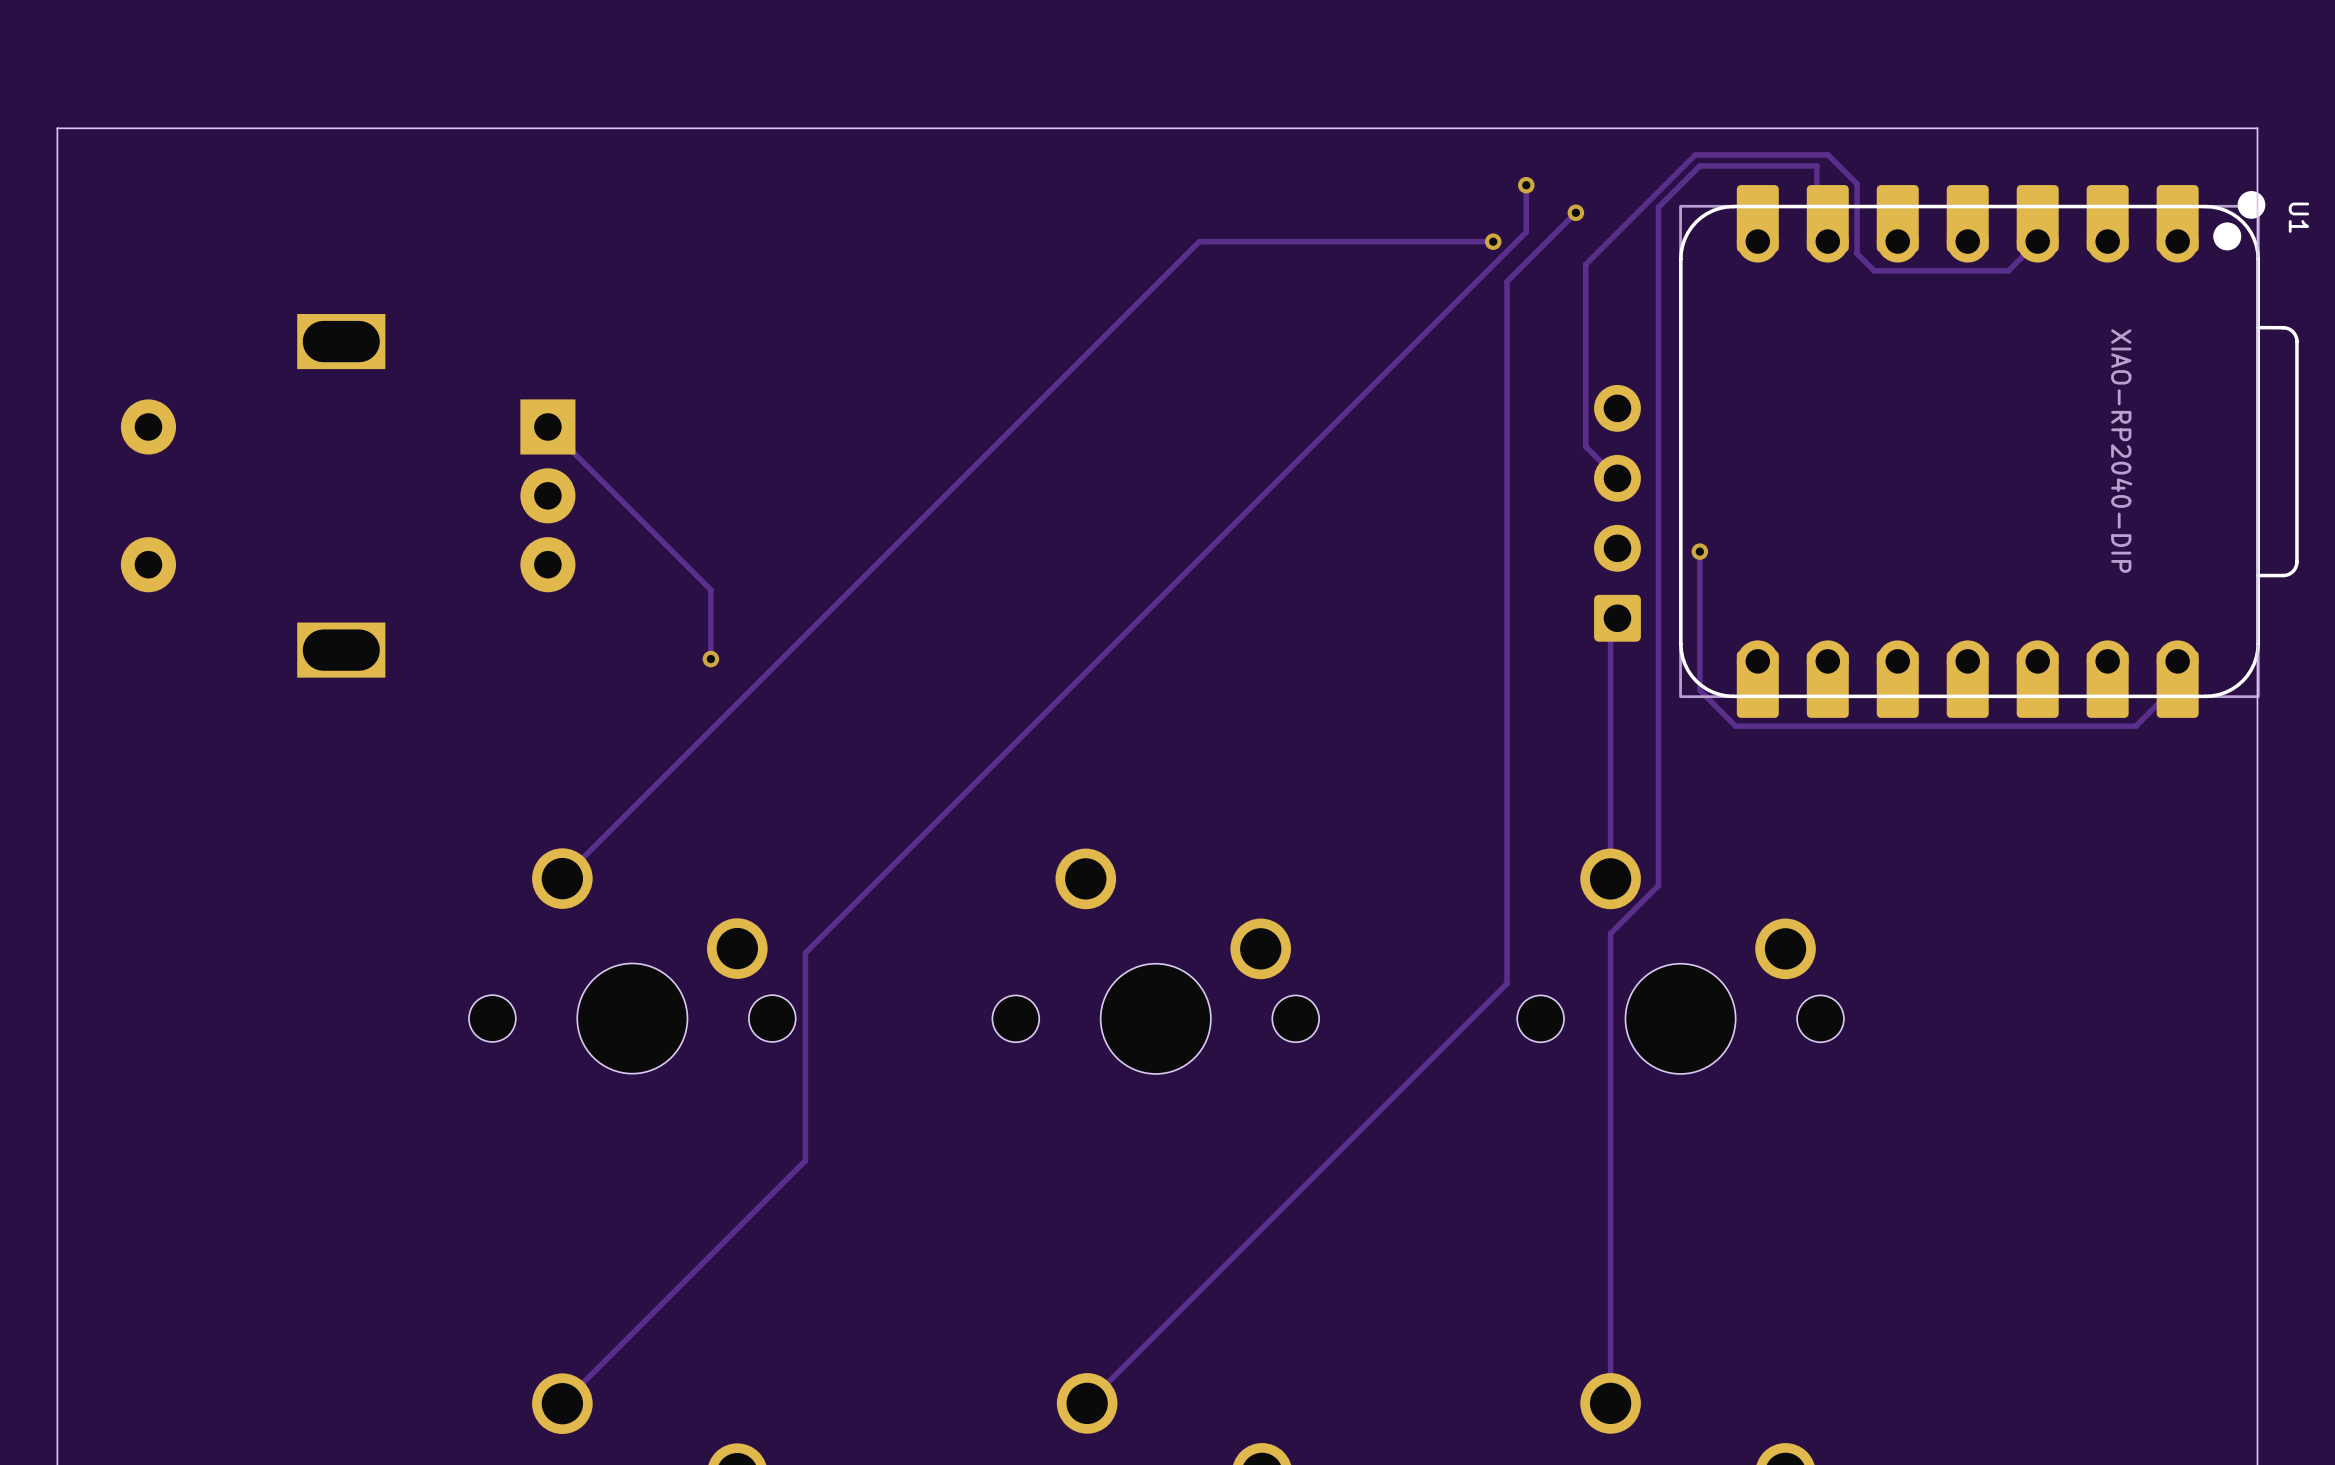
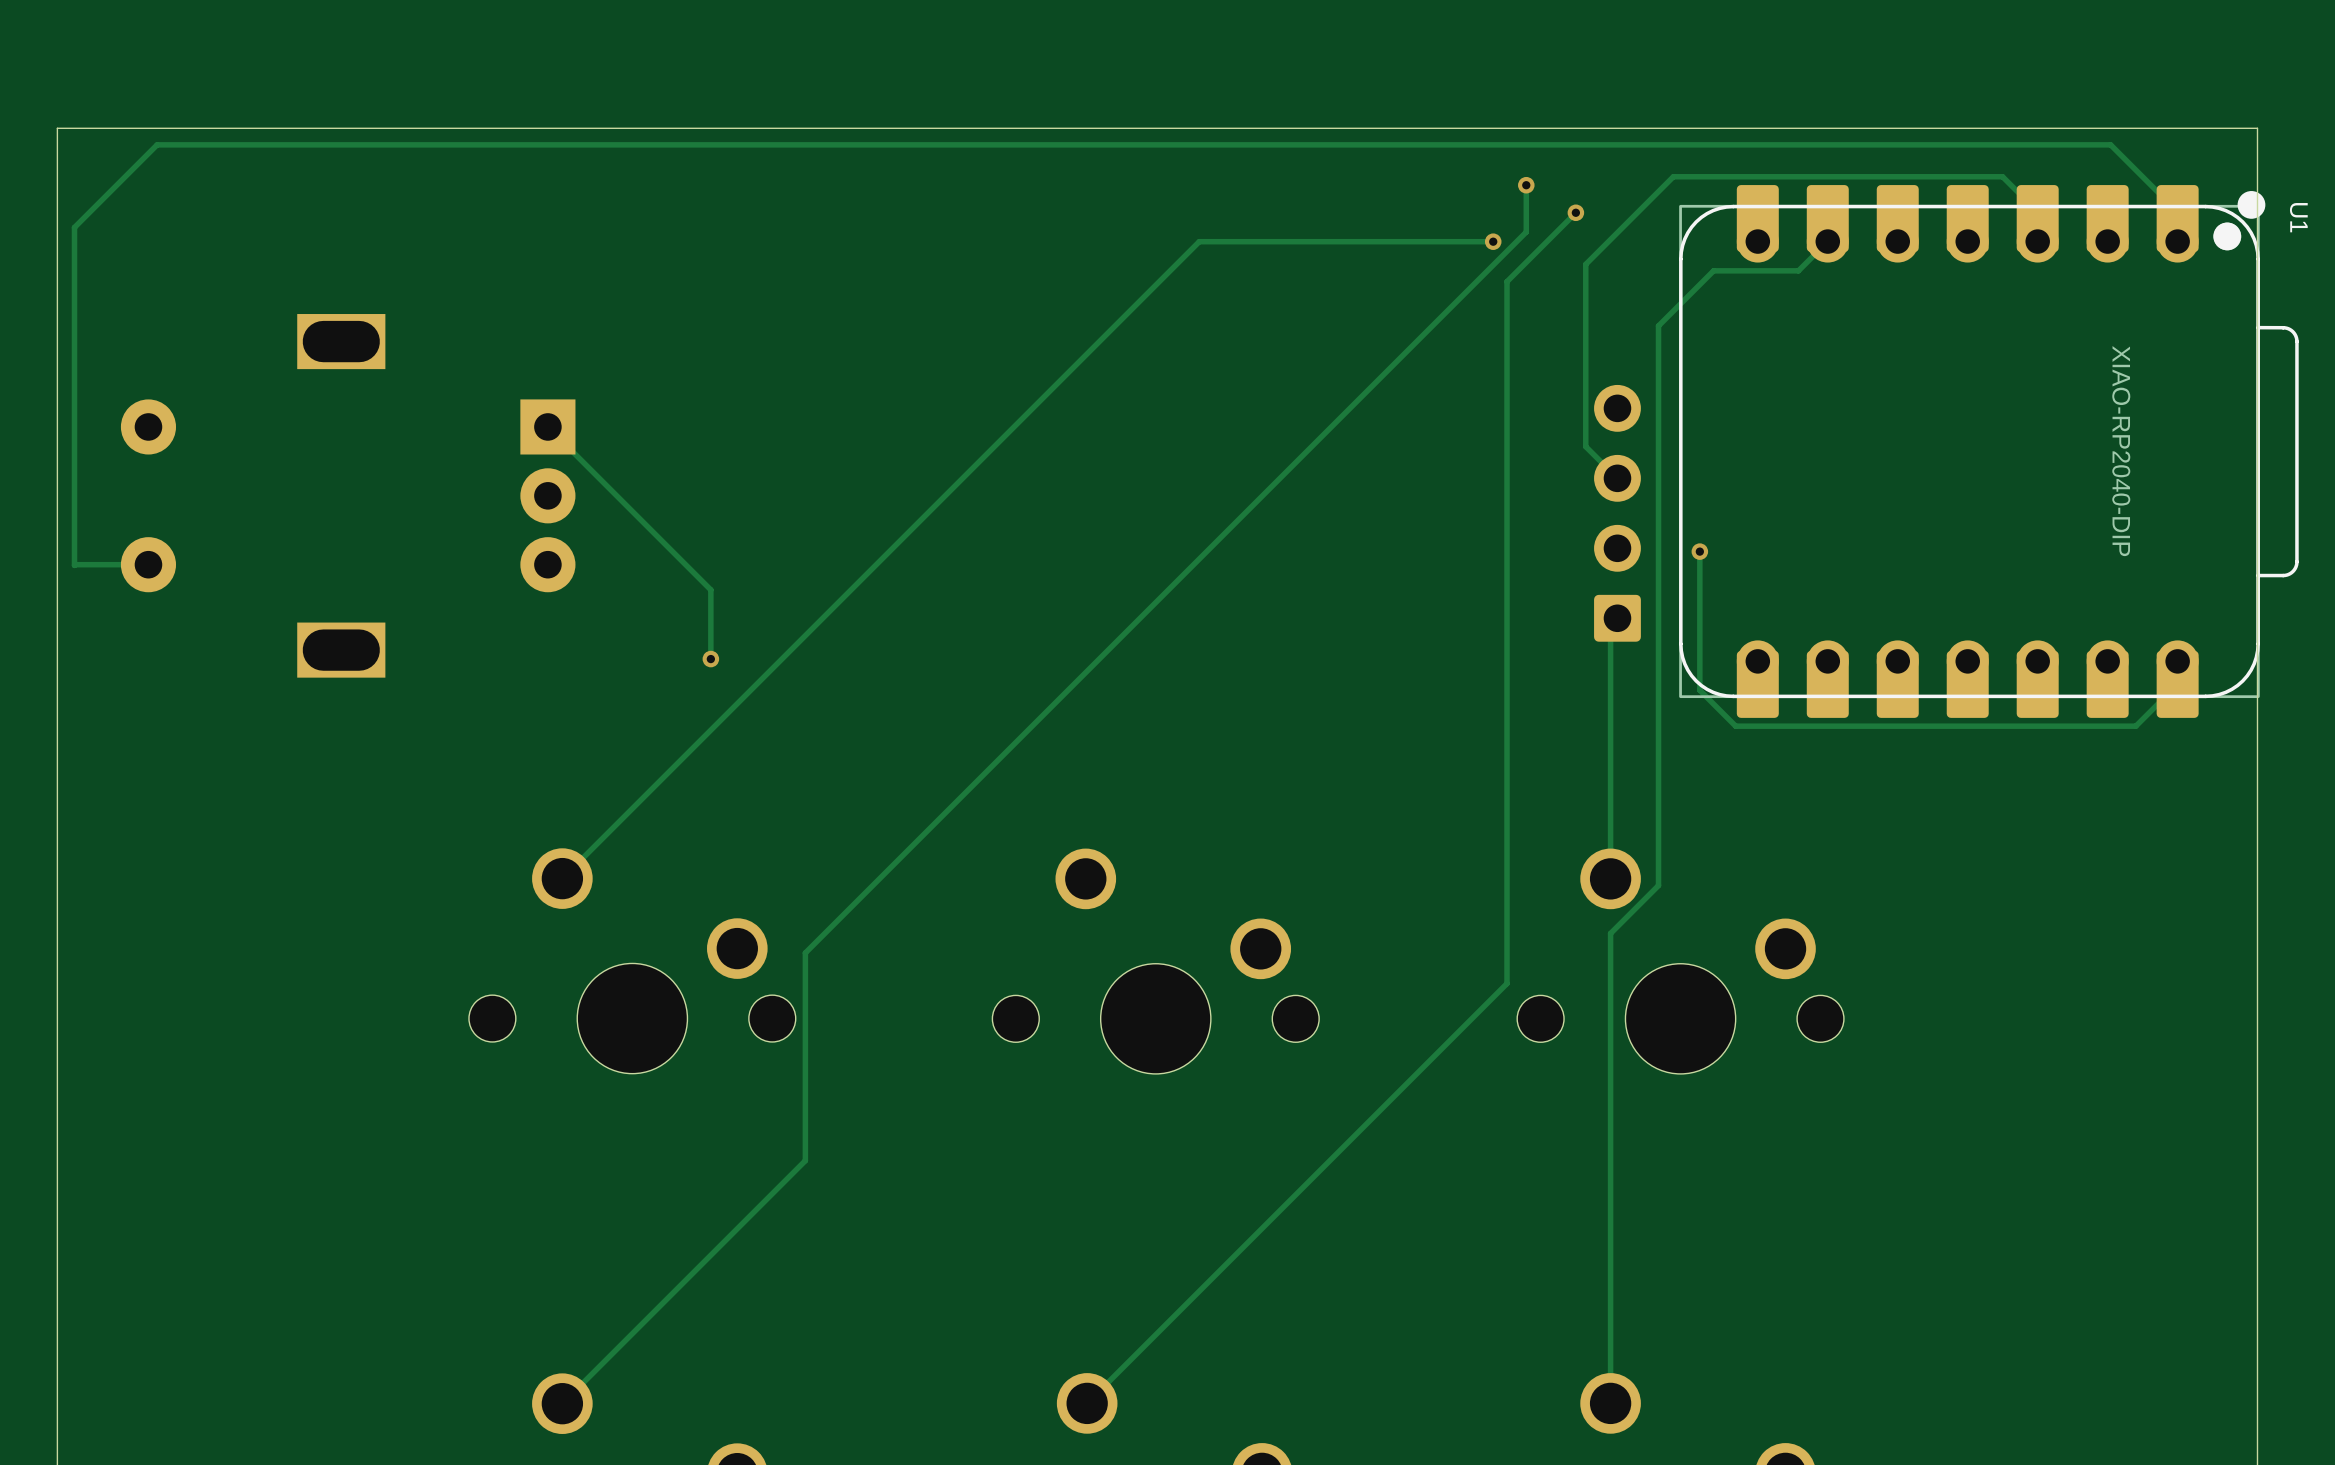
track: (1673, 176) (1695, 154) (1828, 154) (1857, 183) (1857, 253) (1874, 270) (2008, 270) (2037, 241) -> (1673, 176) (2002, 176) (2037, 211) (2037, 241)
track: (1816, 230) (1816, 165) (1699, 165) (1658, 207) (1658, 325) -> (1827, 241) (1798, 270) (1713, 270) (1658, 325)
track: none -> (2177, 241) (2177, 211) (2110, 144) (157, 144) (74, 227) (74, 565) (148, 564)

